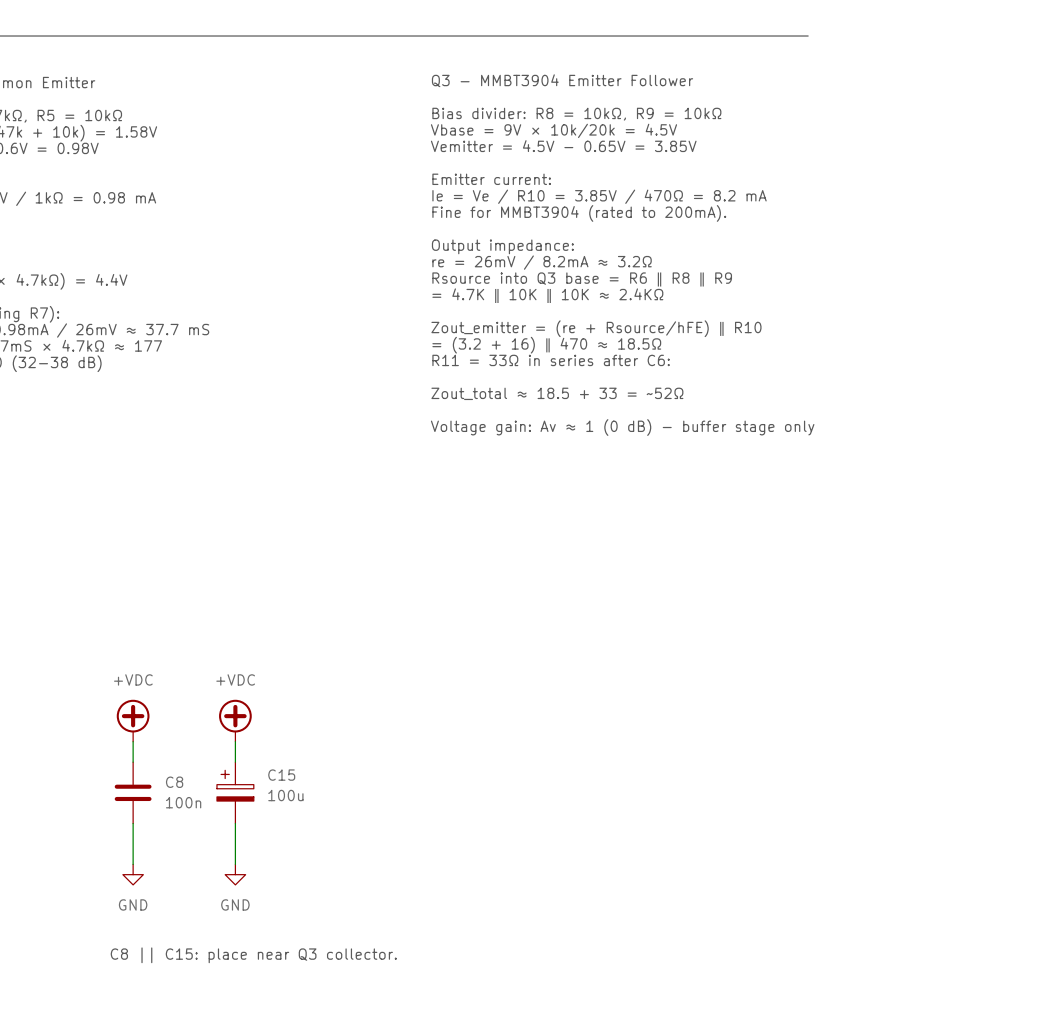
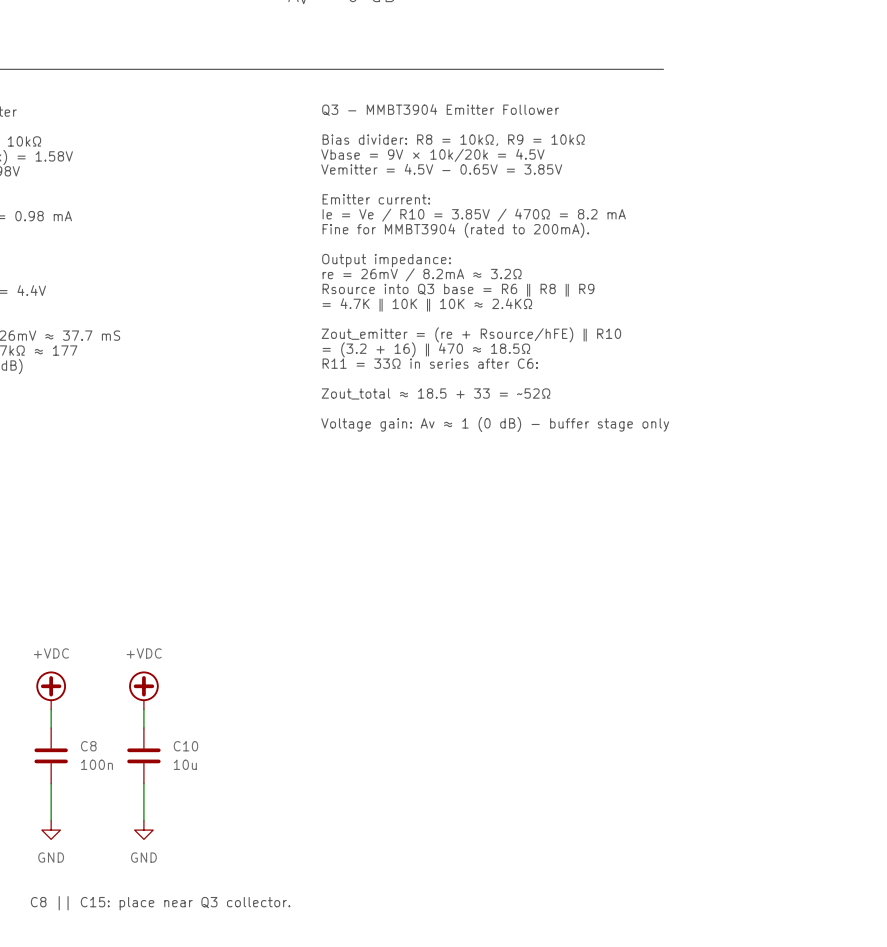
C15: 100u (235, 792) -> none
C10: none -> 10u (143, 755)

